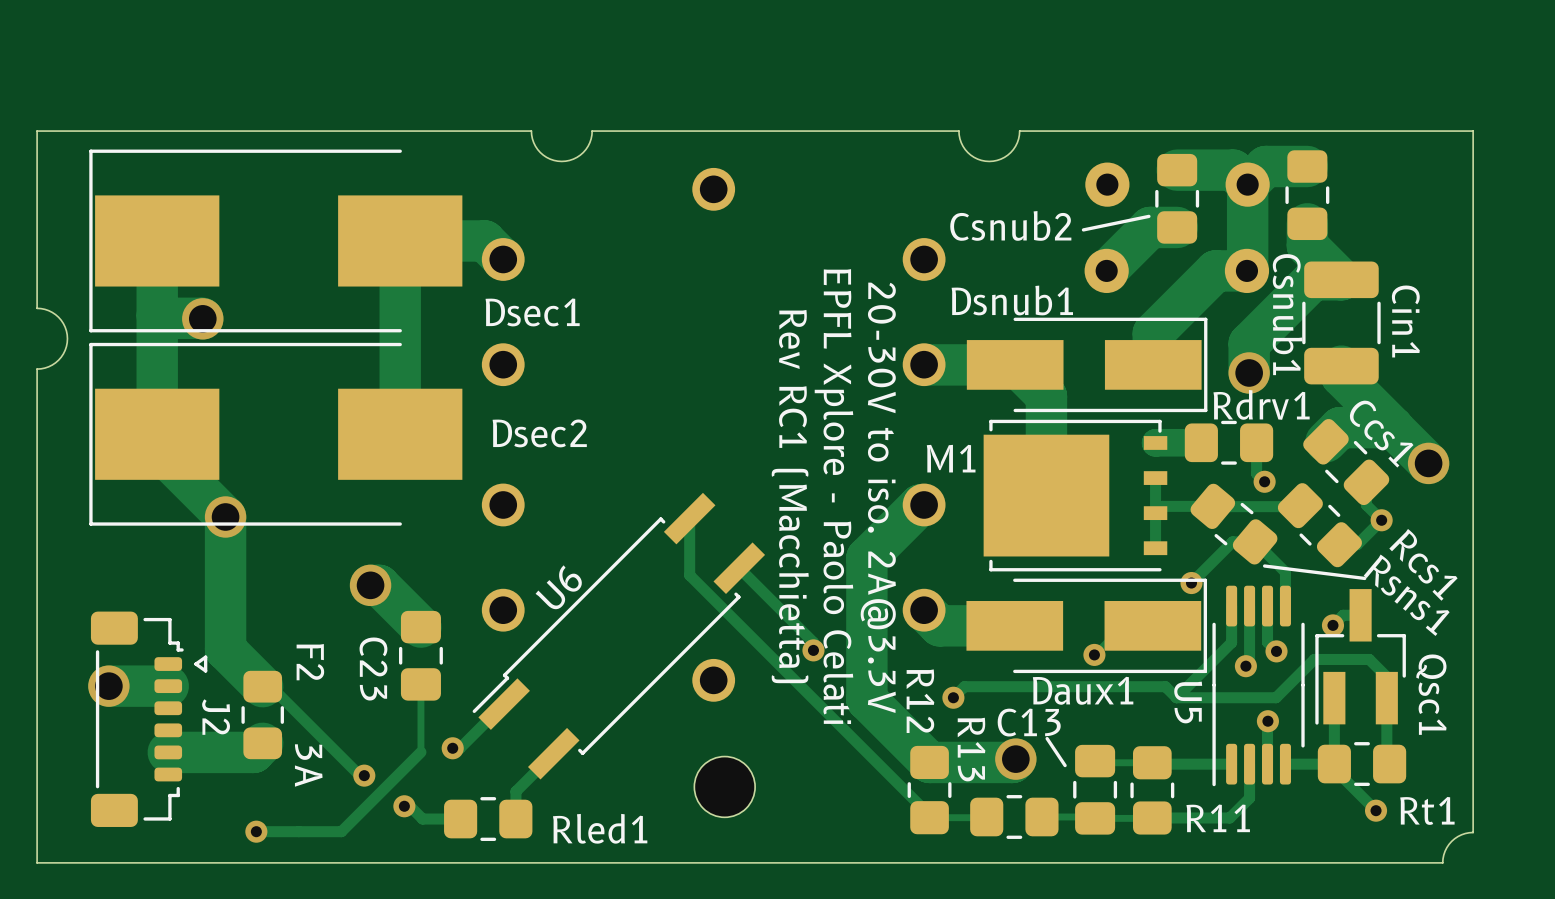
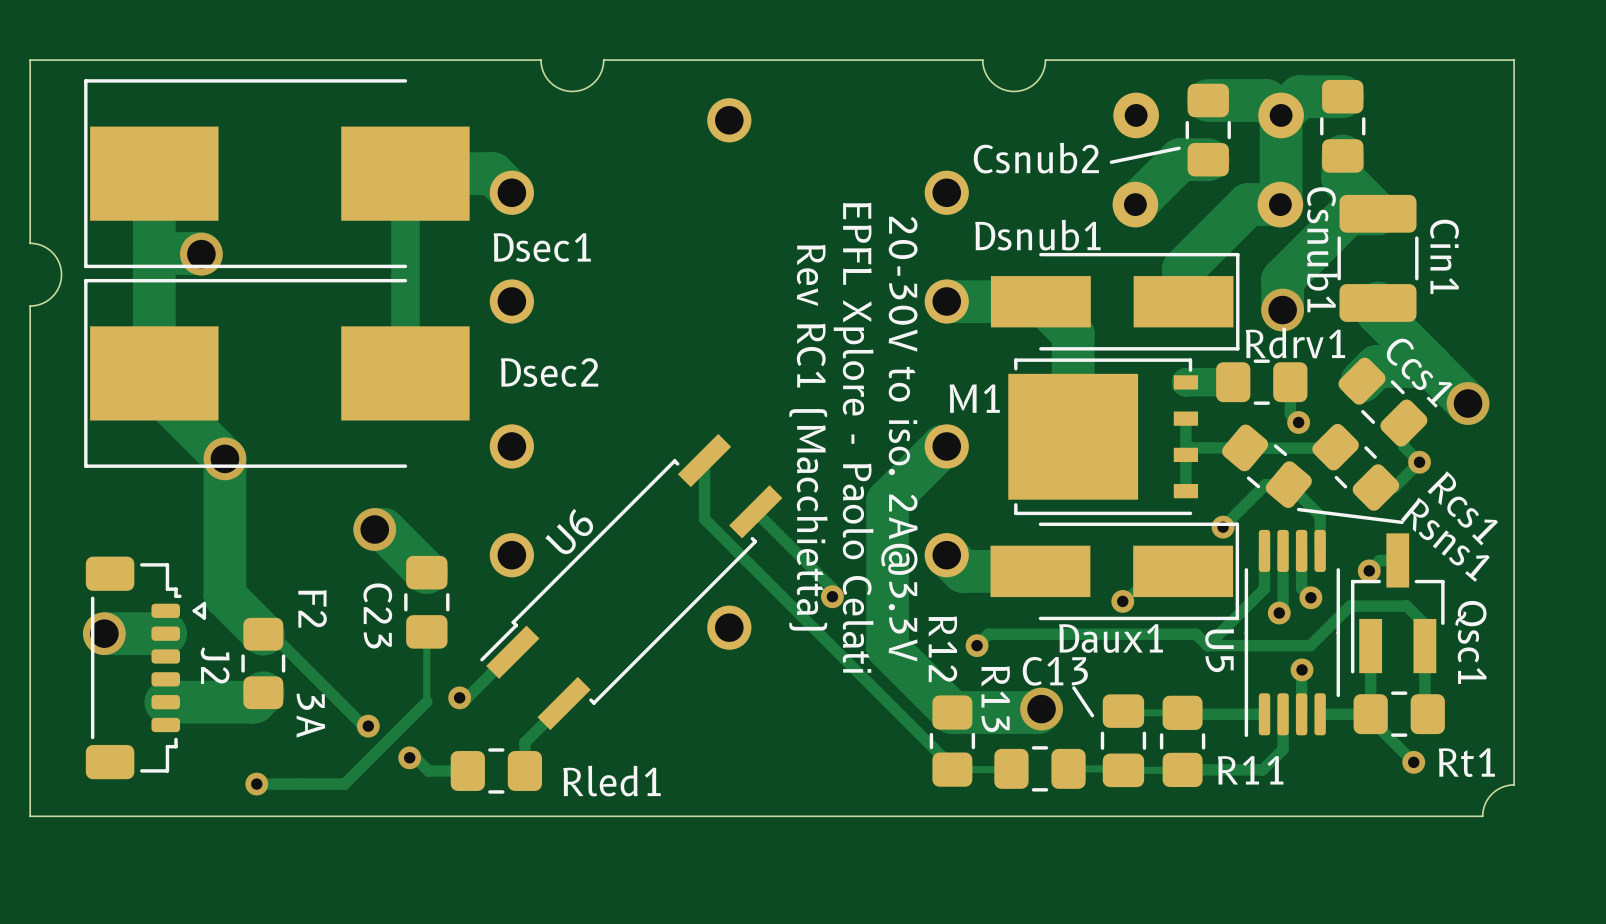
track width: thick (400, 240) (400, 434) -> thin (405, 173) (405, 373)
part: (724, 786) -> none

